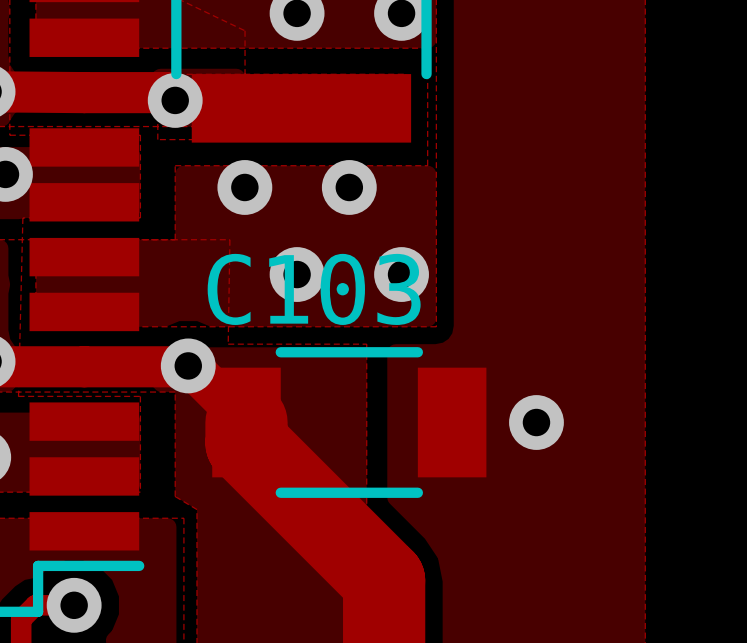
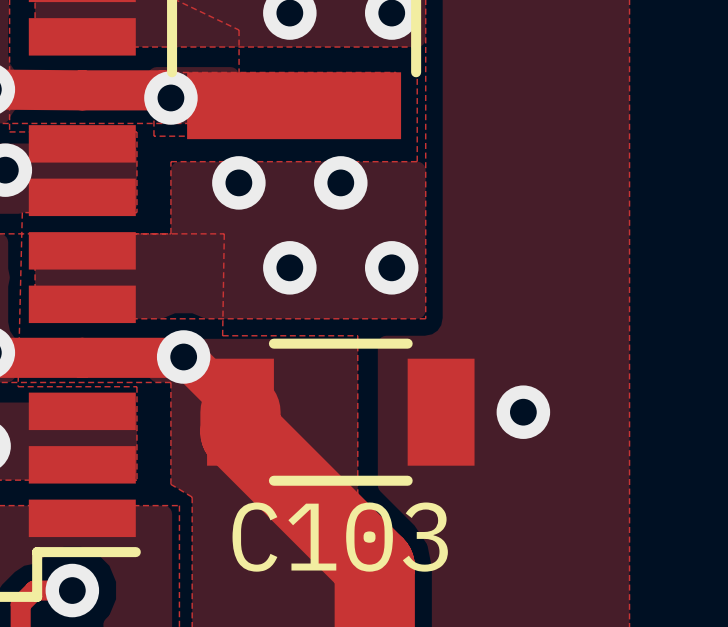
C103 name position: C103 (314, 289) -> C103 (340, 537)

